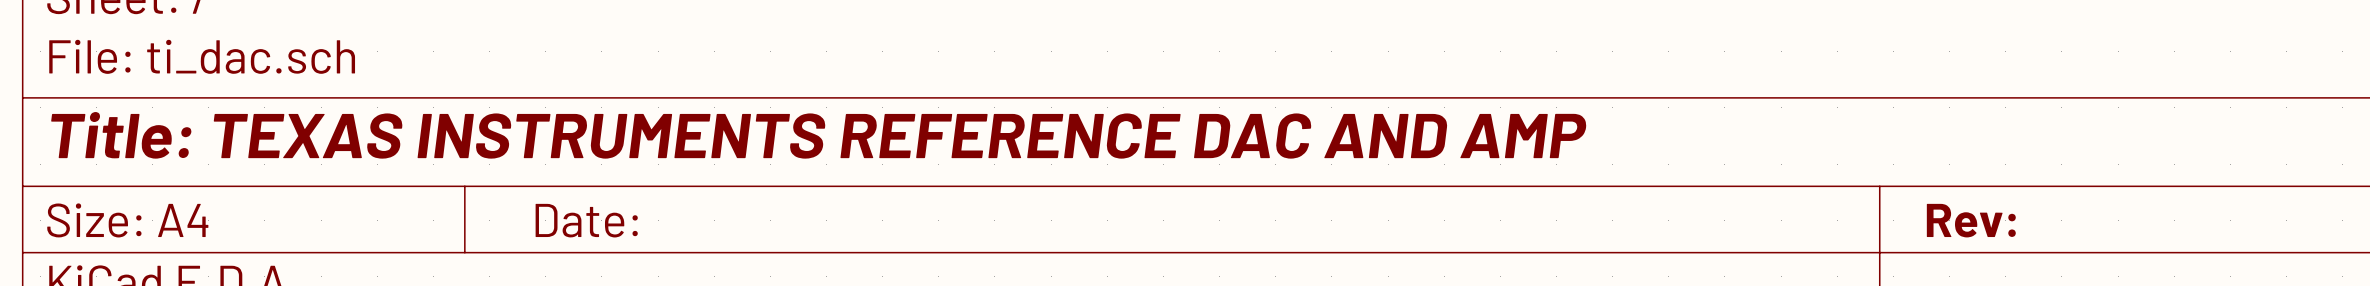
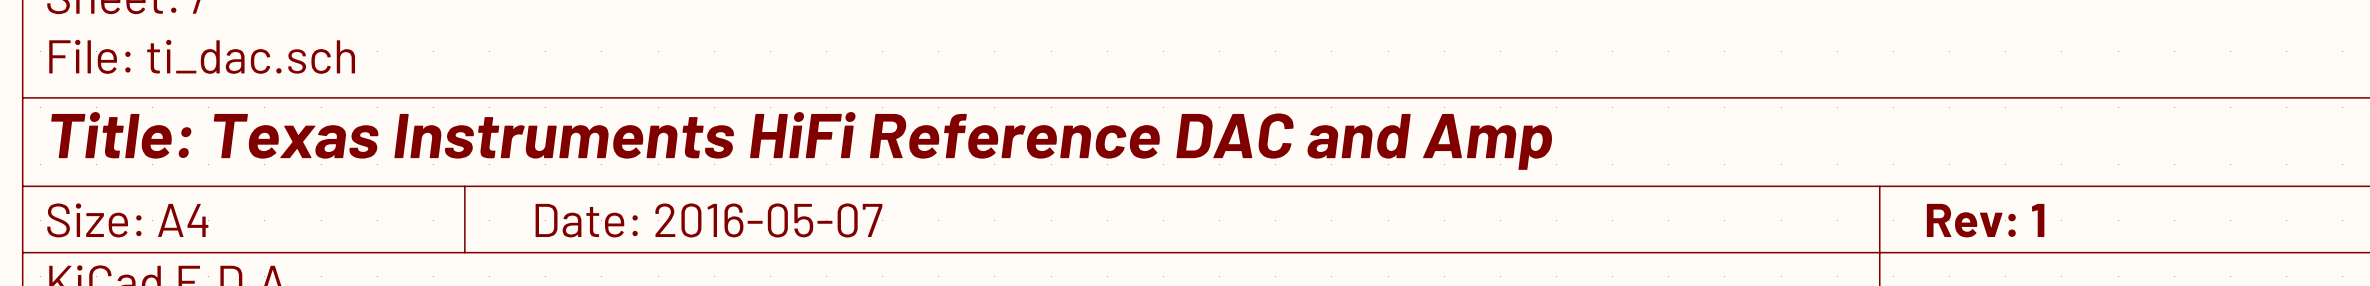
title block: Title: TEXAS INSTRUMENTS REFERENCE DAC AND AMP (818, 135) -> Title: Texas Instruments HiFi Reference DAC and Amp (801, 140)
title block: Date: (586, 220) -> Date: 2016-05-07 (709, 220)
title block: Rev: (1971, 220) -> Rev: 1 (1985, 220)

